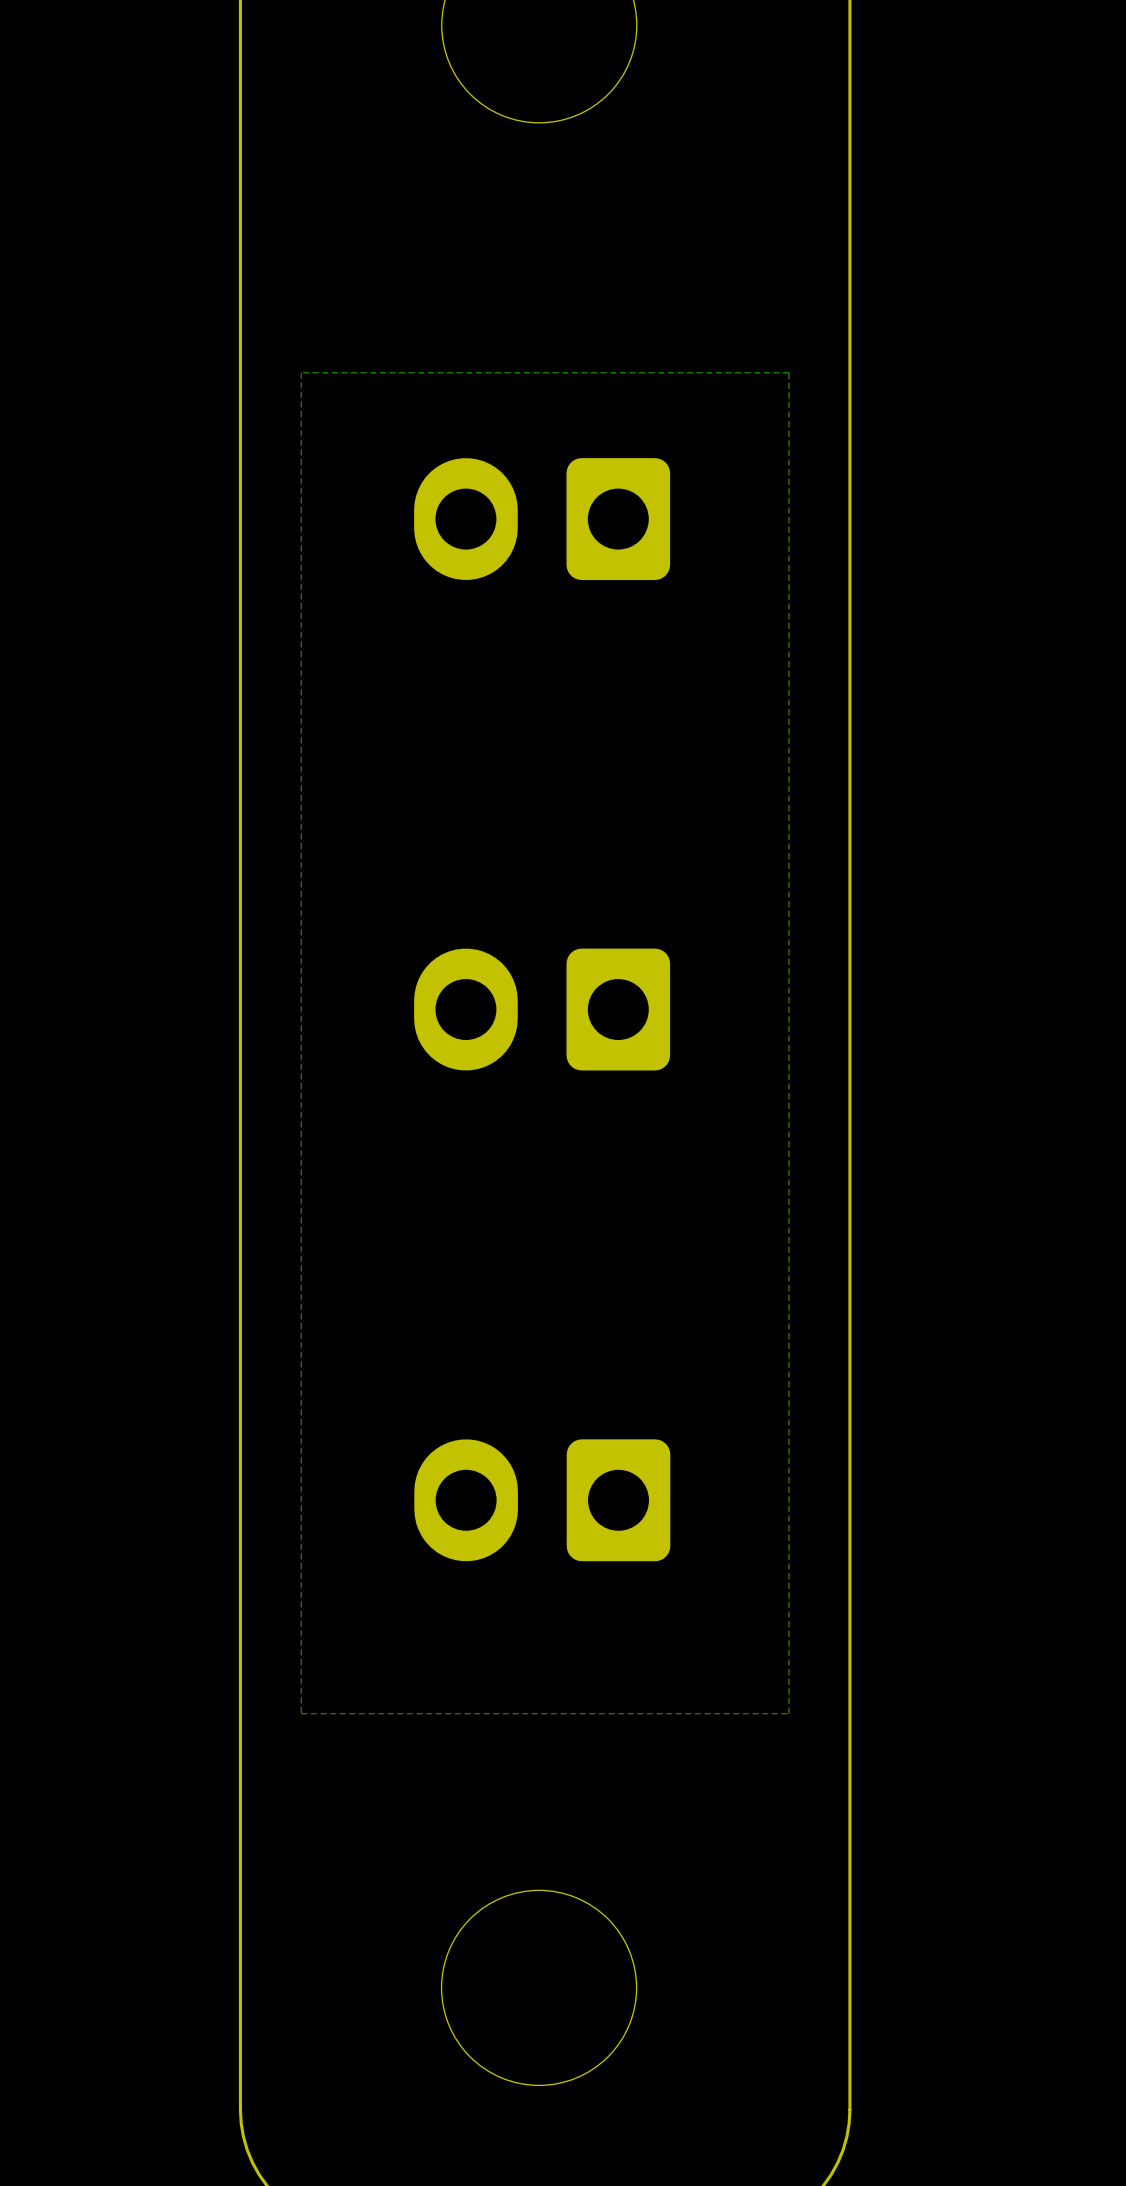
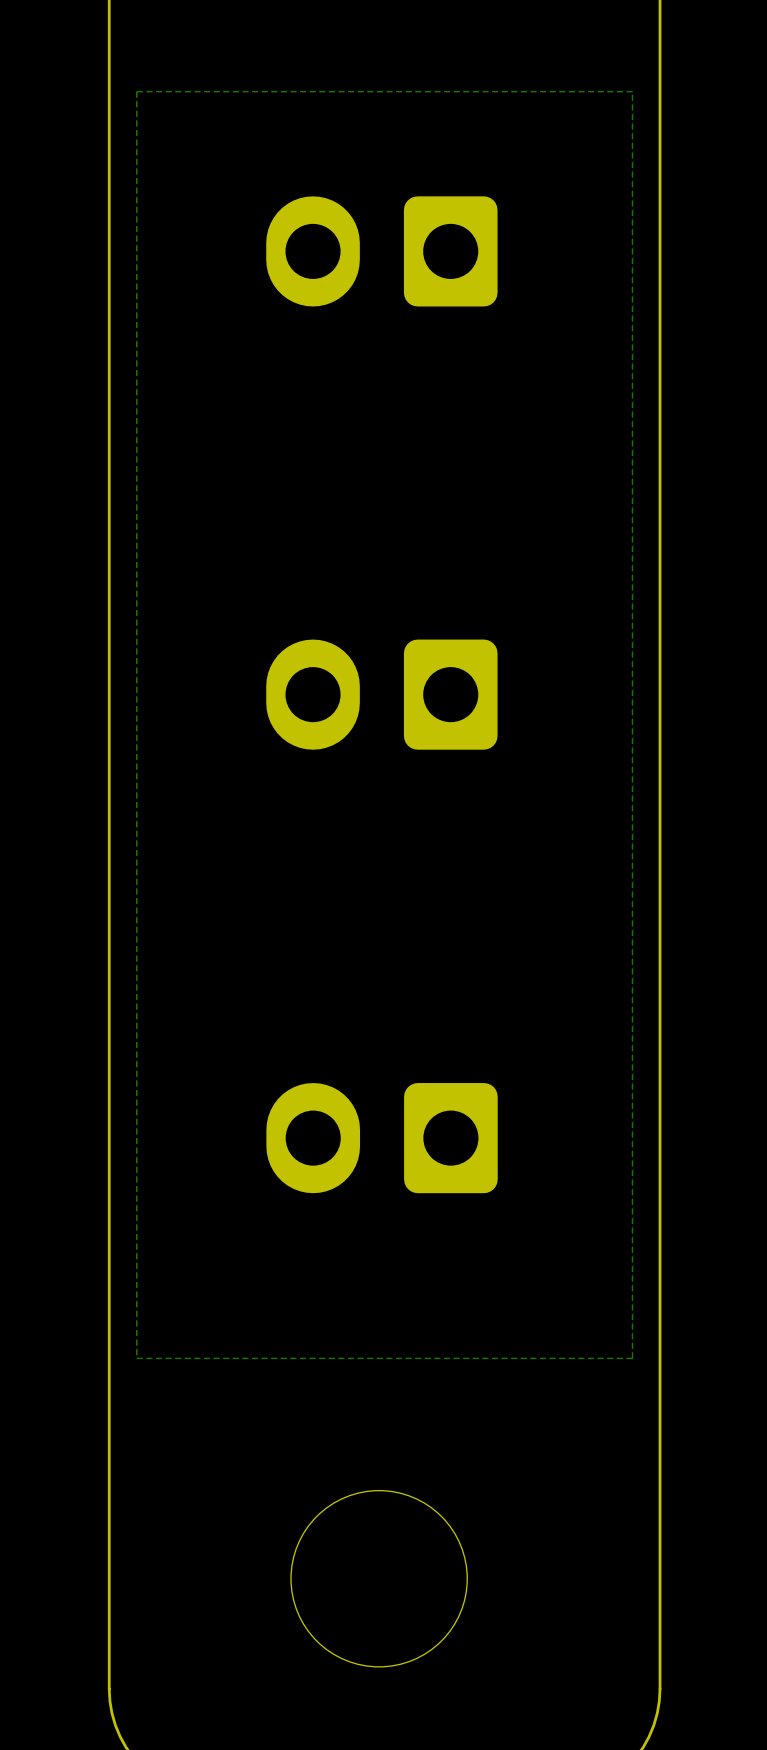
bottom zone outline: (788, 372) (301, 372) (301, 1713) (788, 1713) (788, 372) -> (632, 91) (632, 1358) (136, 1358) (136, 91) (632, 91)

